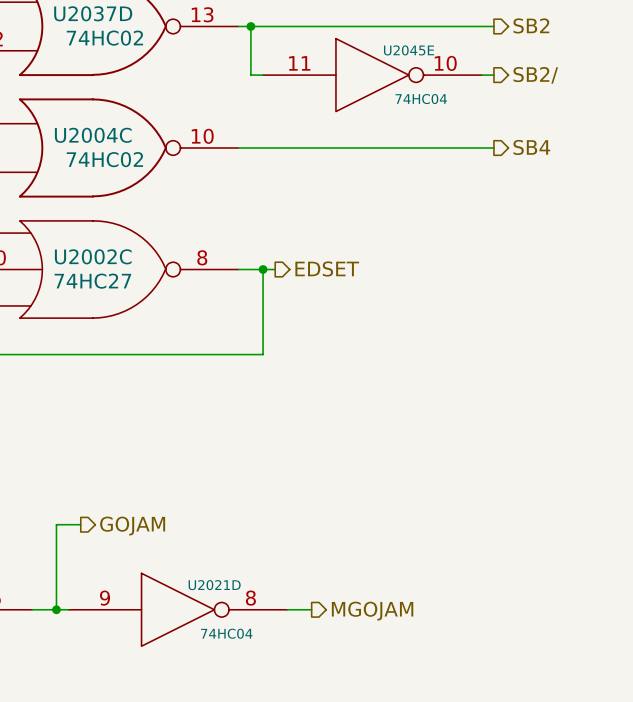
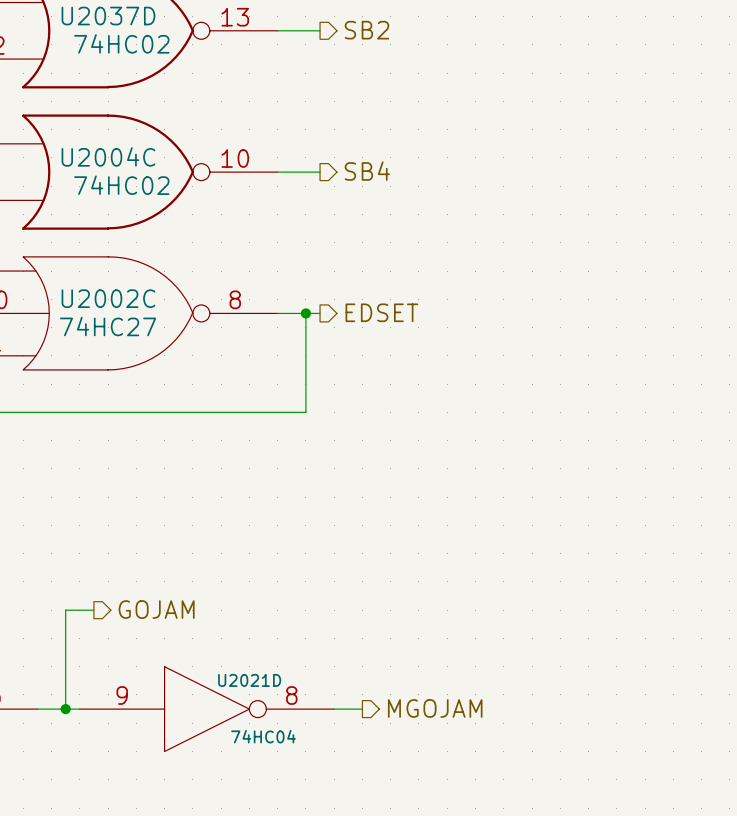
hierarchical label position: SB2 (531, 25) -> SB2 (366, 30)
wire: (250, 26) (250, 75) (263, 75) -> none
junction: (250, 26) -> none
wire: (275, 26) (493, 26) -> none
U2045E: 74HC04 (372, 75) -> none
wire: (481, 75) (493, 75) -> none
hierarchical label: SB2/ (535, 75) -> none
hierarchical label position: SB4 (531, 147) -> SB4 (367, 171)
wire: (275, 148) (493, 148) -> none

